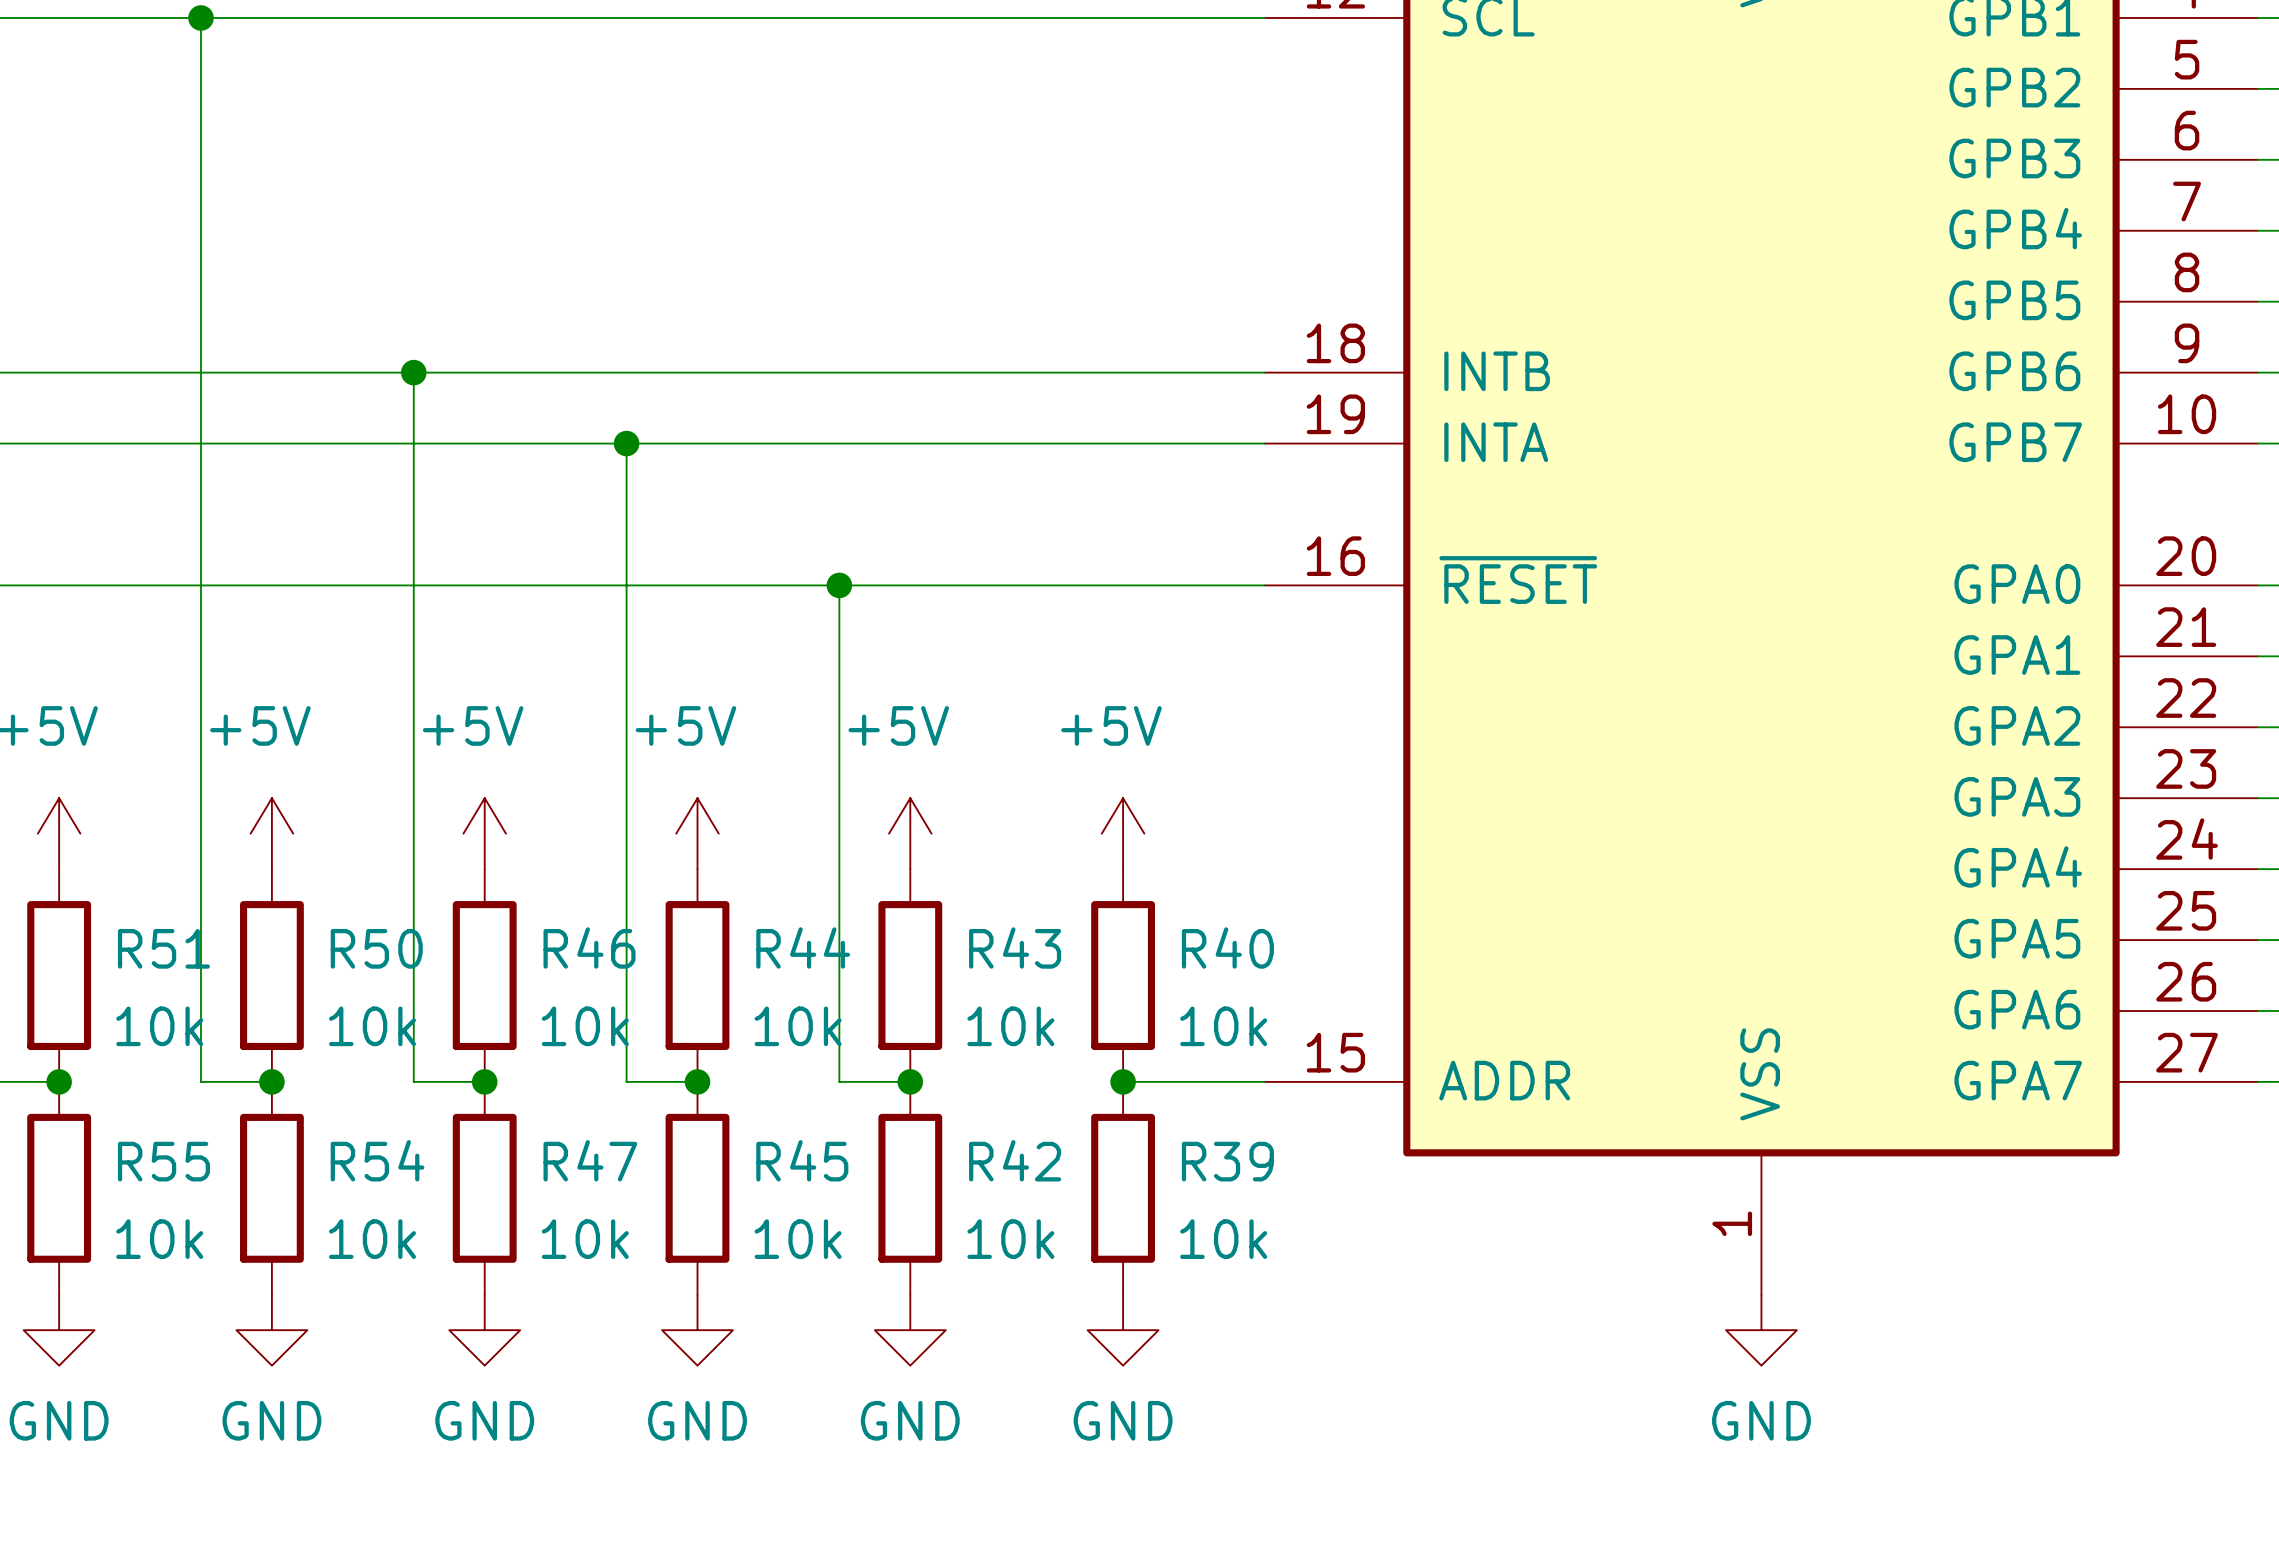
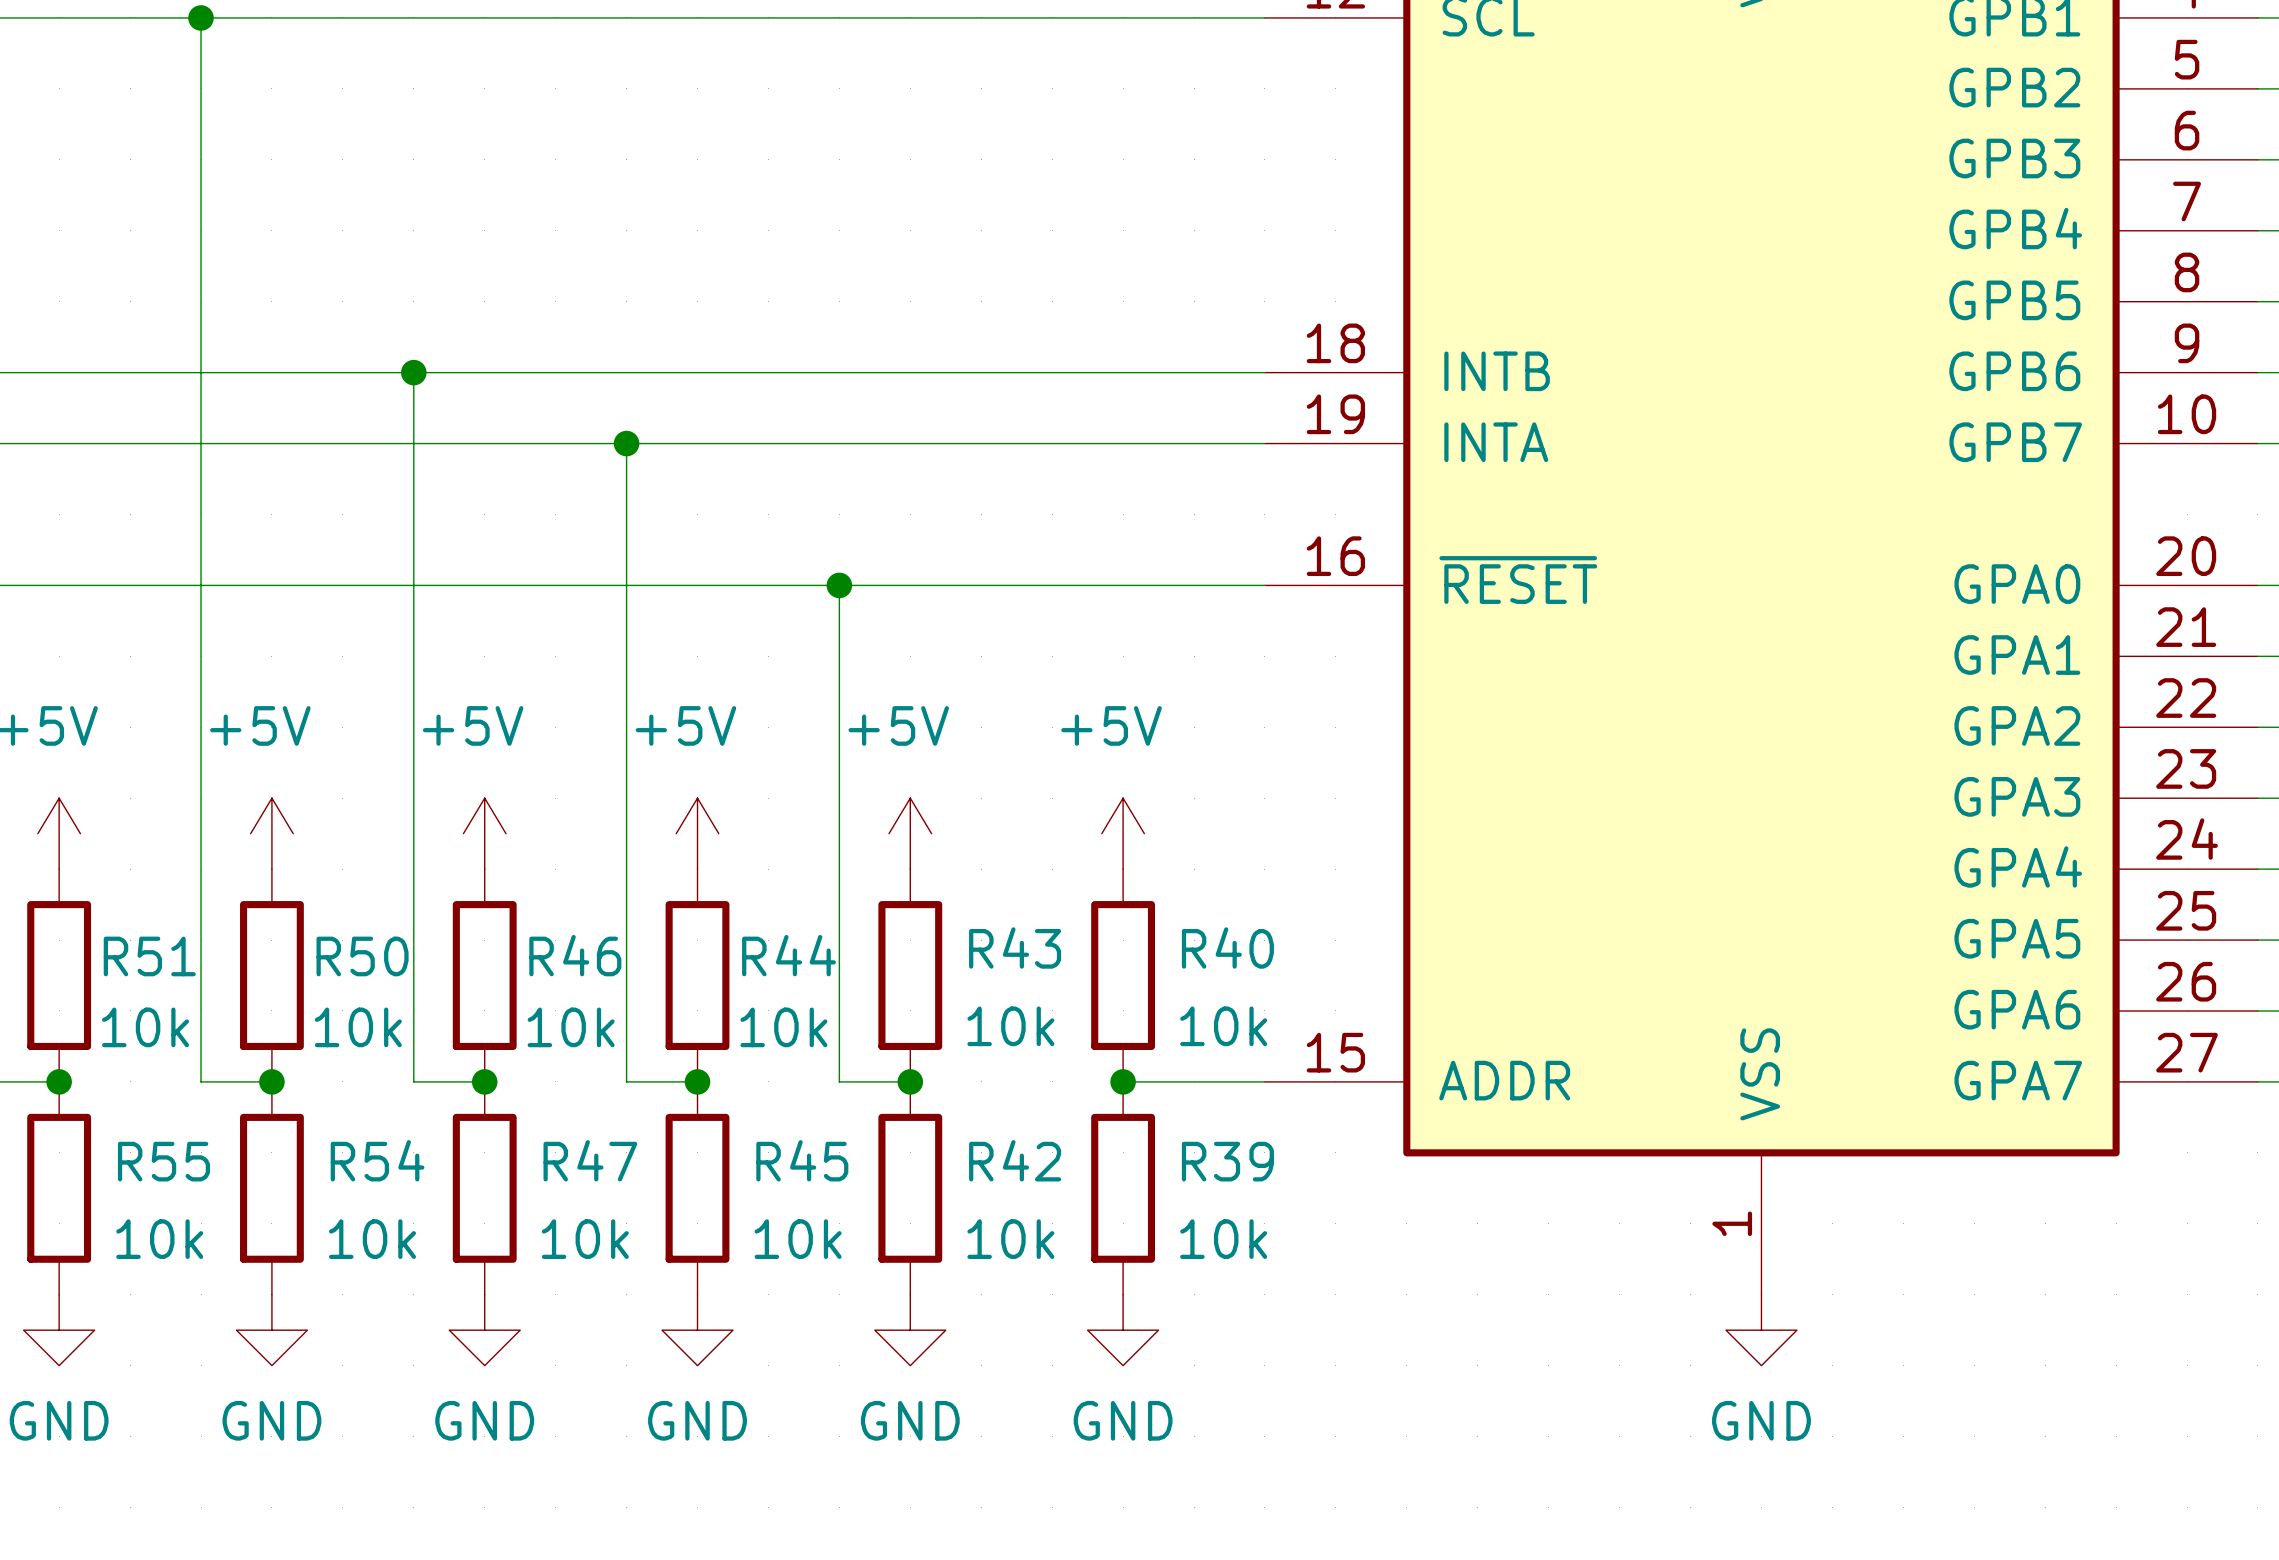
R46 name position: R46 (589, 947) -> R46 (575, 955)
R44 name position: R44 (803, 947) -> R44 (788, 955)
R51 name position: R51 (163, 948) -> R51 (149, 956)
R50 name position: R50 (376, 948) -> R50 (362, 956)
R51 value position: 10k (159, 1026) -> 10k (145, 1027)
R50 value position: 10k (372, 1026) -> 10k (358, 1027)
R46 value position: 10k (585, 1026) -> 10k (571, 1027)
R44 value position: 10k (798, 1026) -> 10k (783, 1027)

